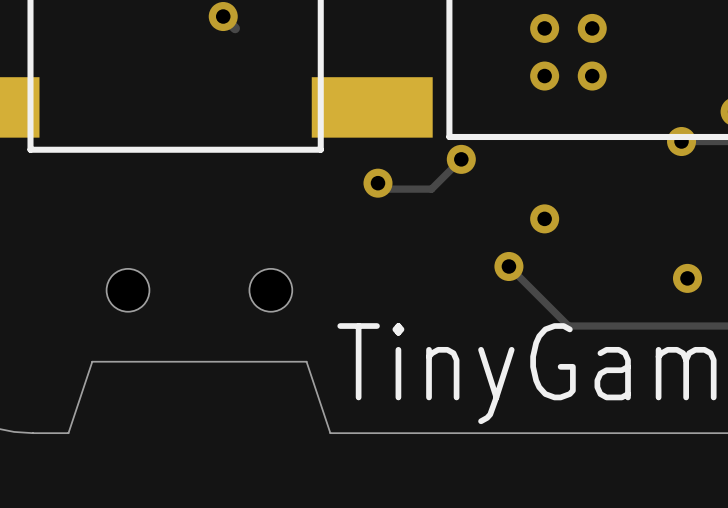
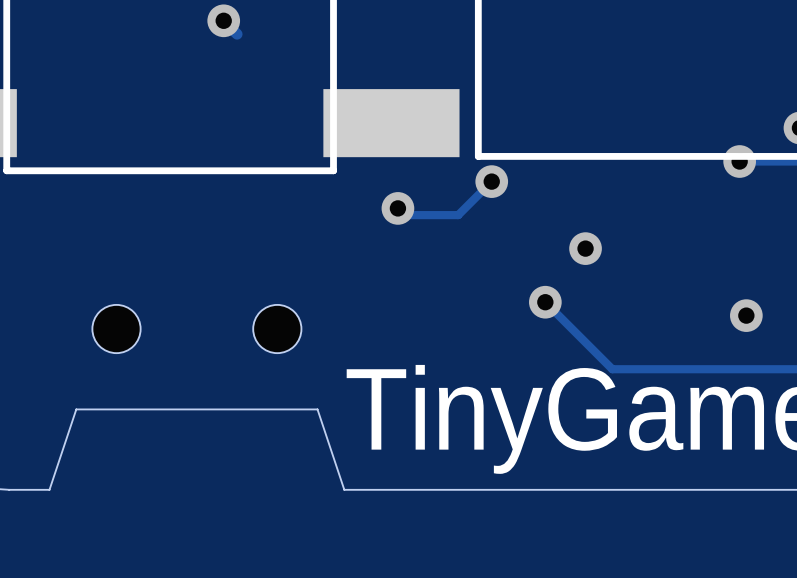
via: (544, 28) -> none
via: (592, 28) -> none
via: (544, 76) -> none
via: (592, 76) -> none

